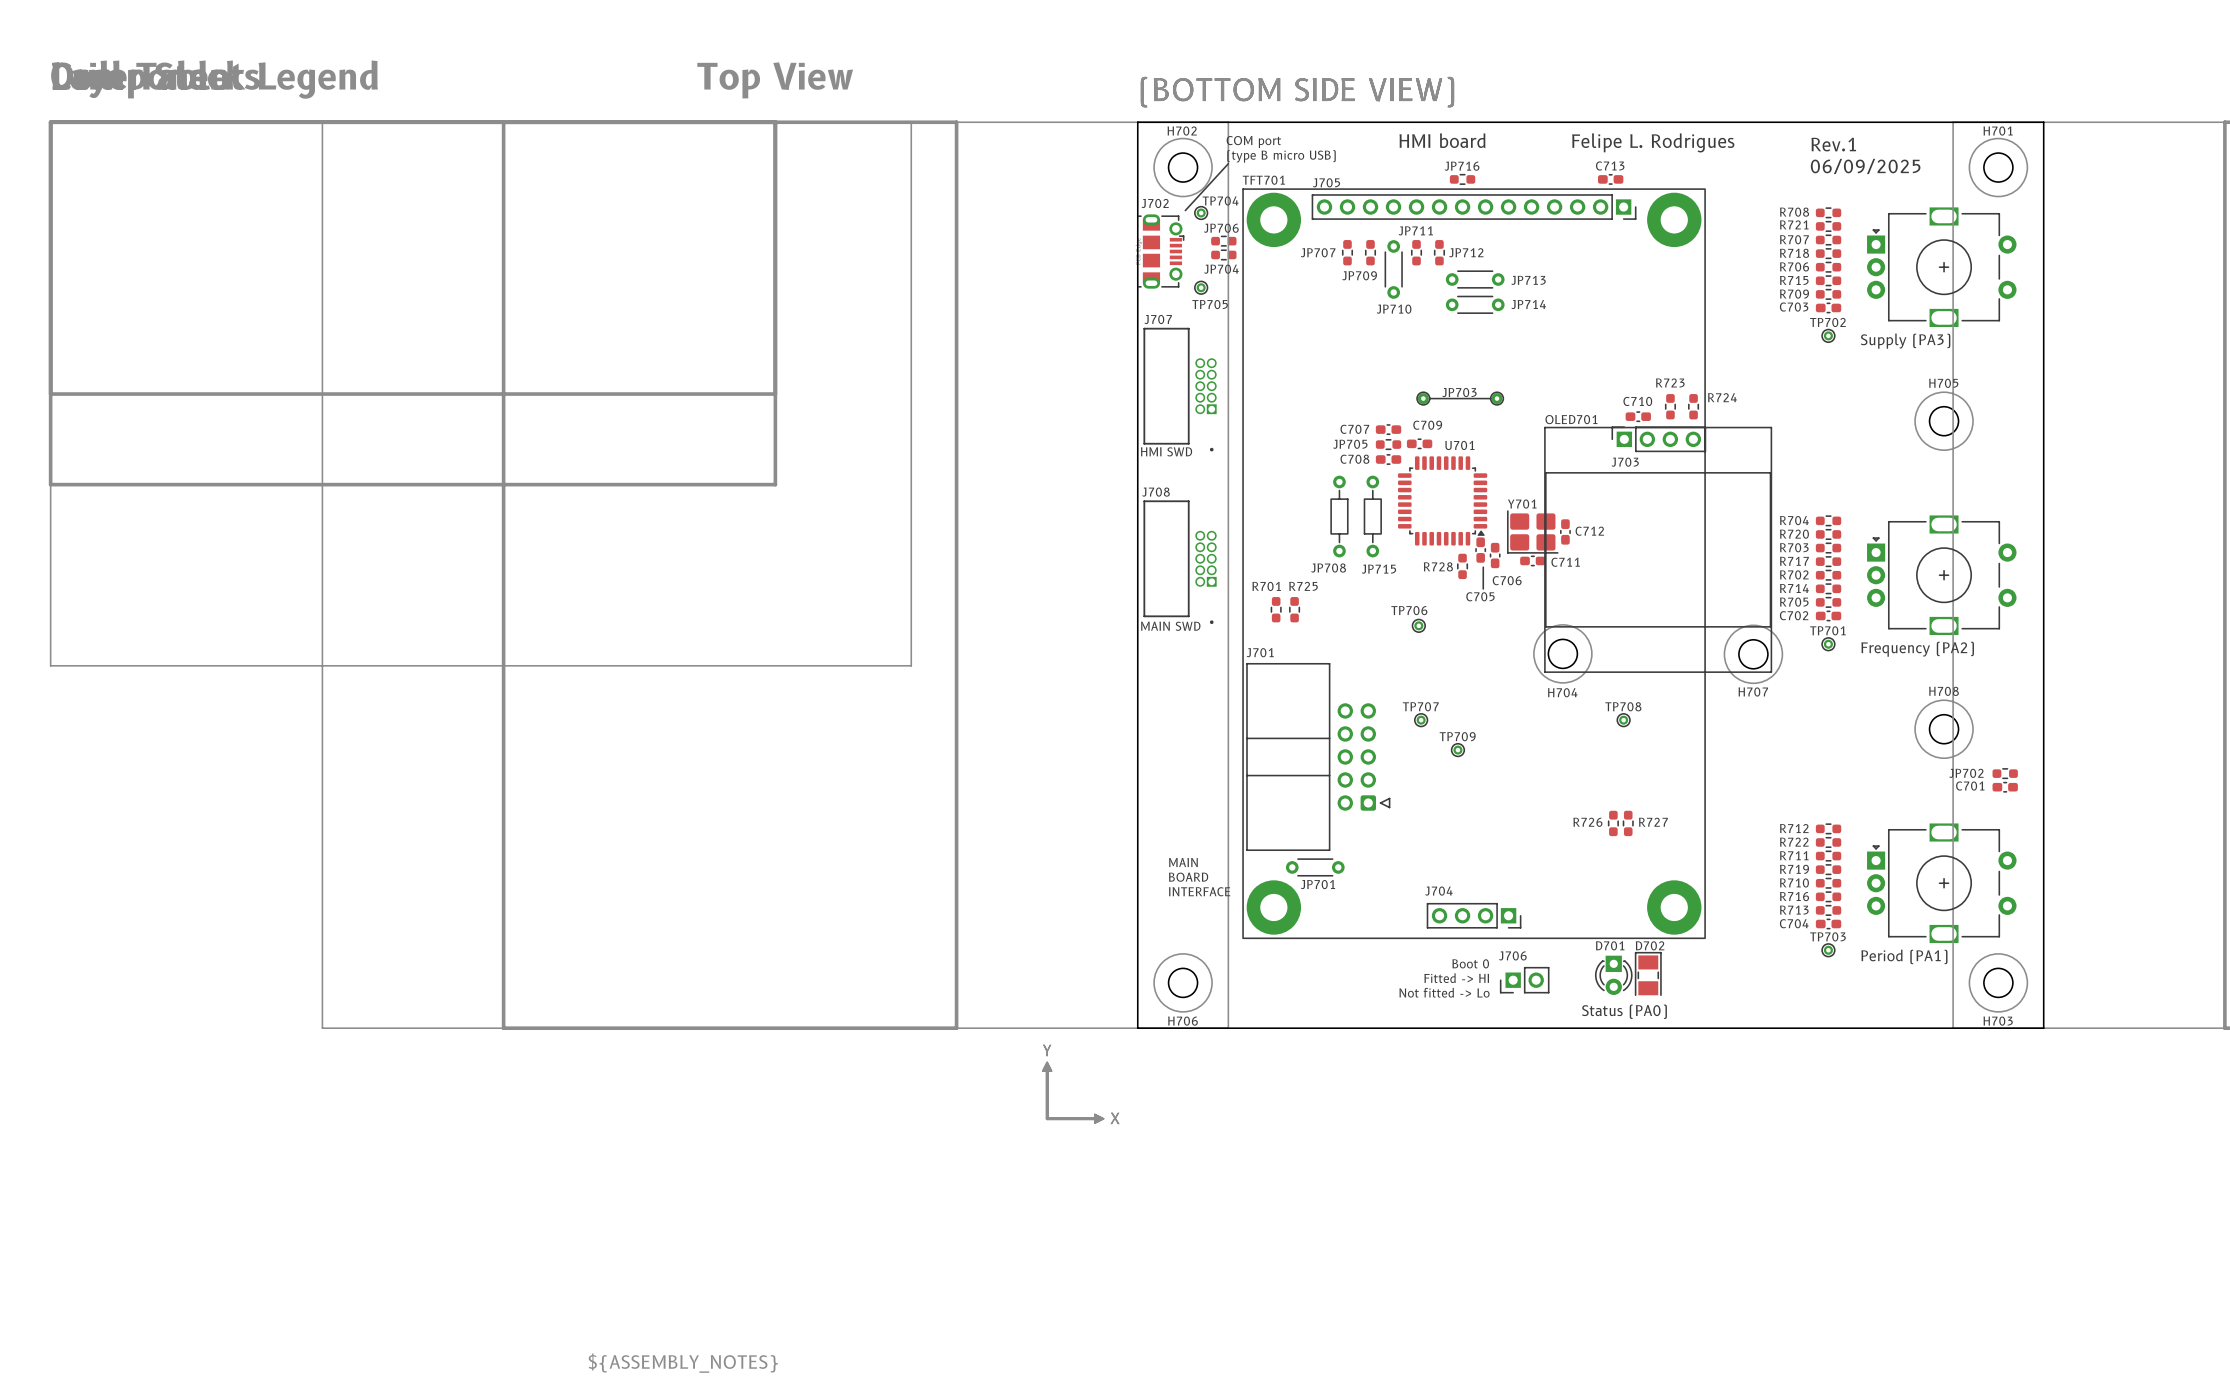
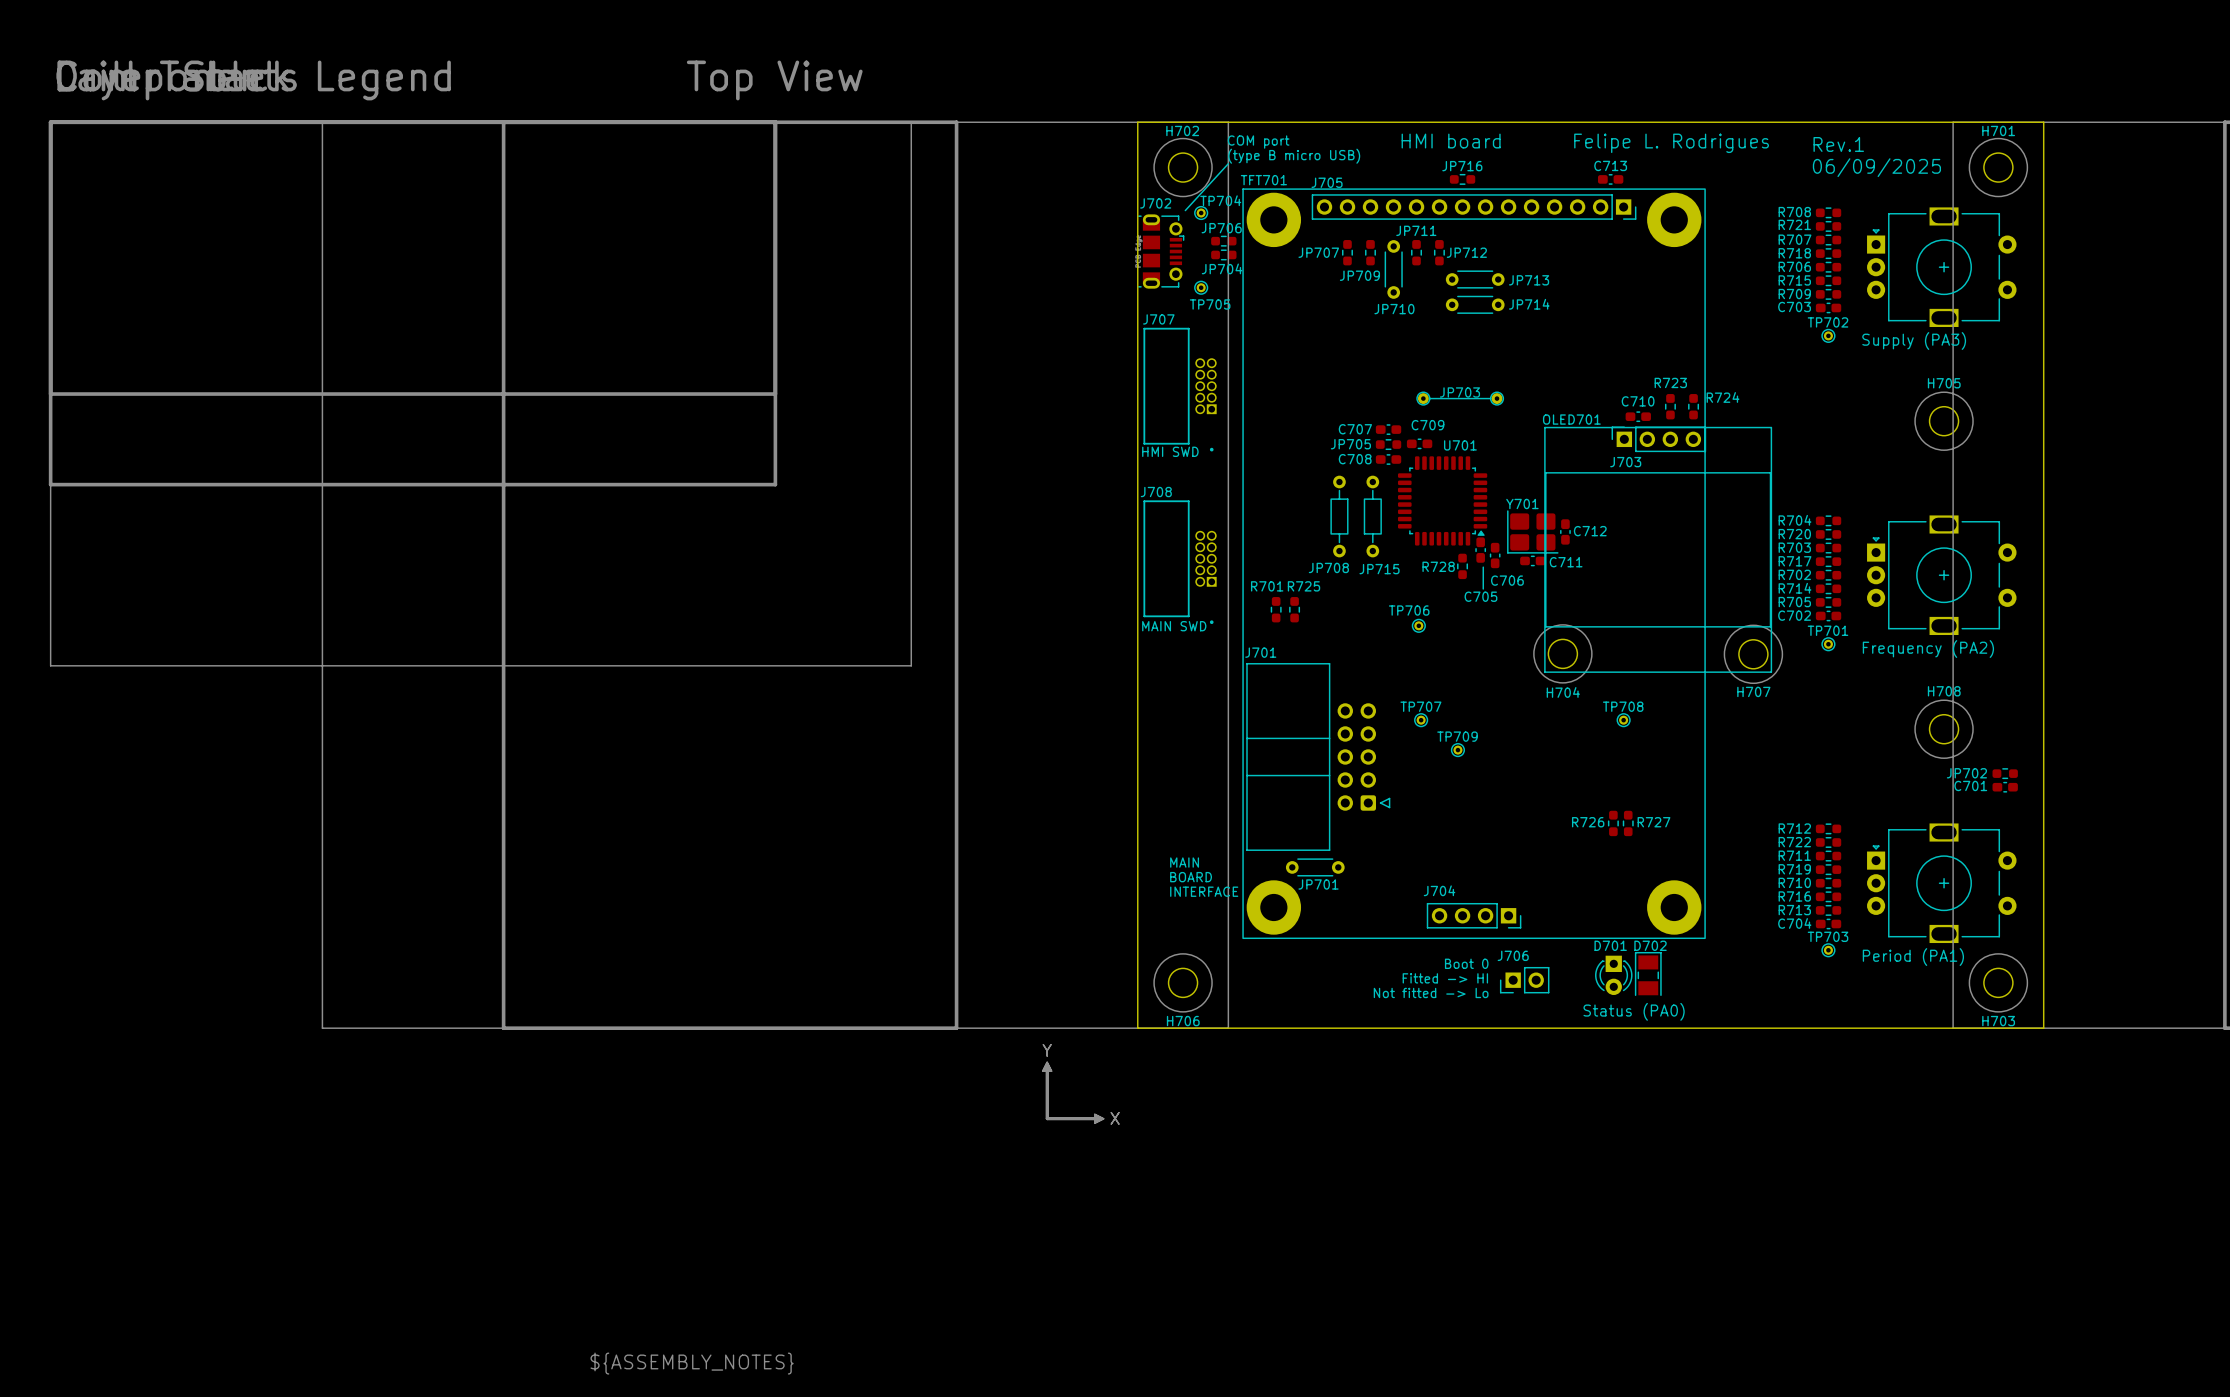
text: (BOTTOM SIDE VIEW) (1297, 92) -> none

